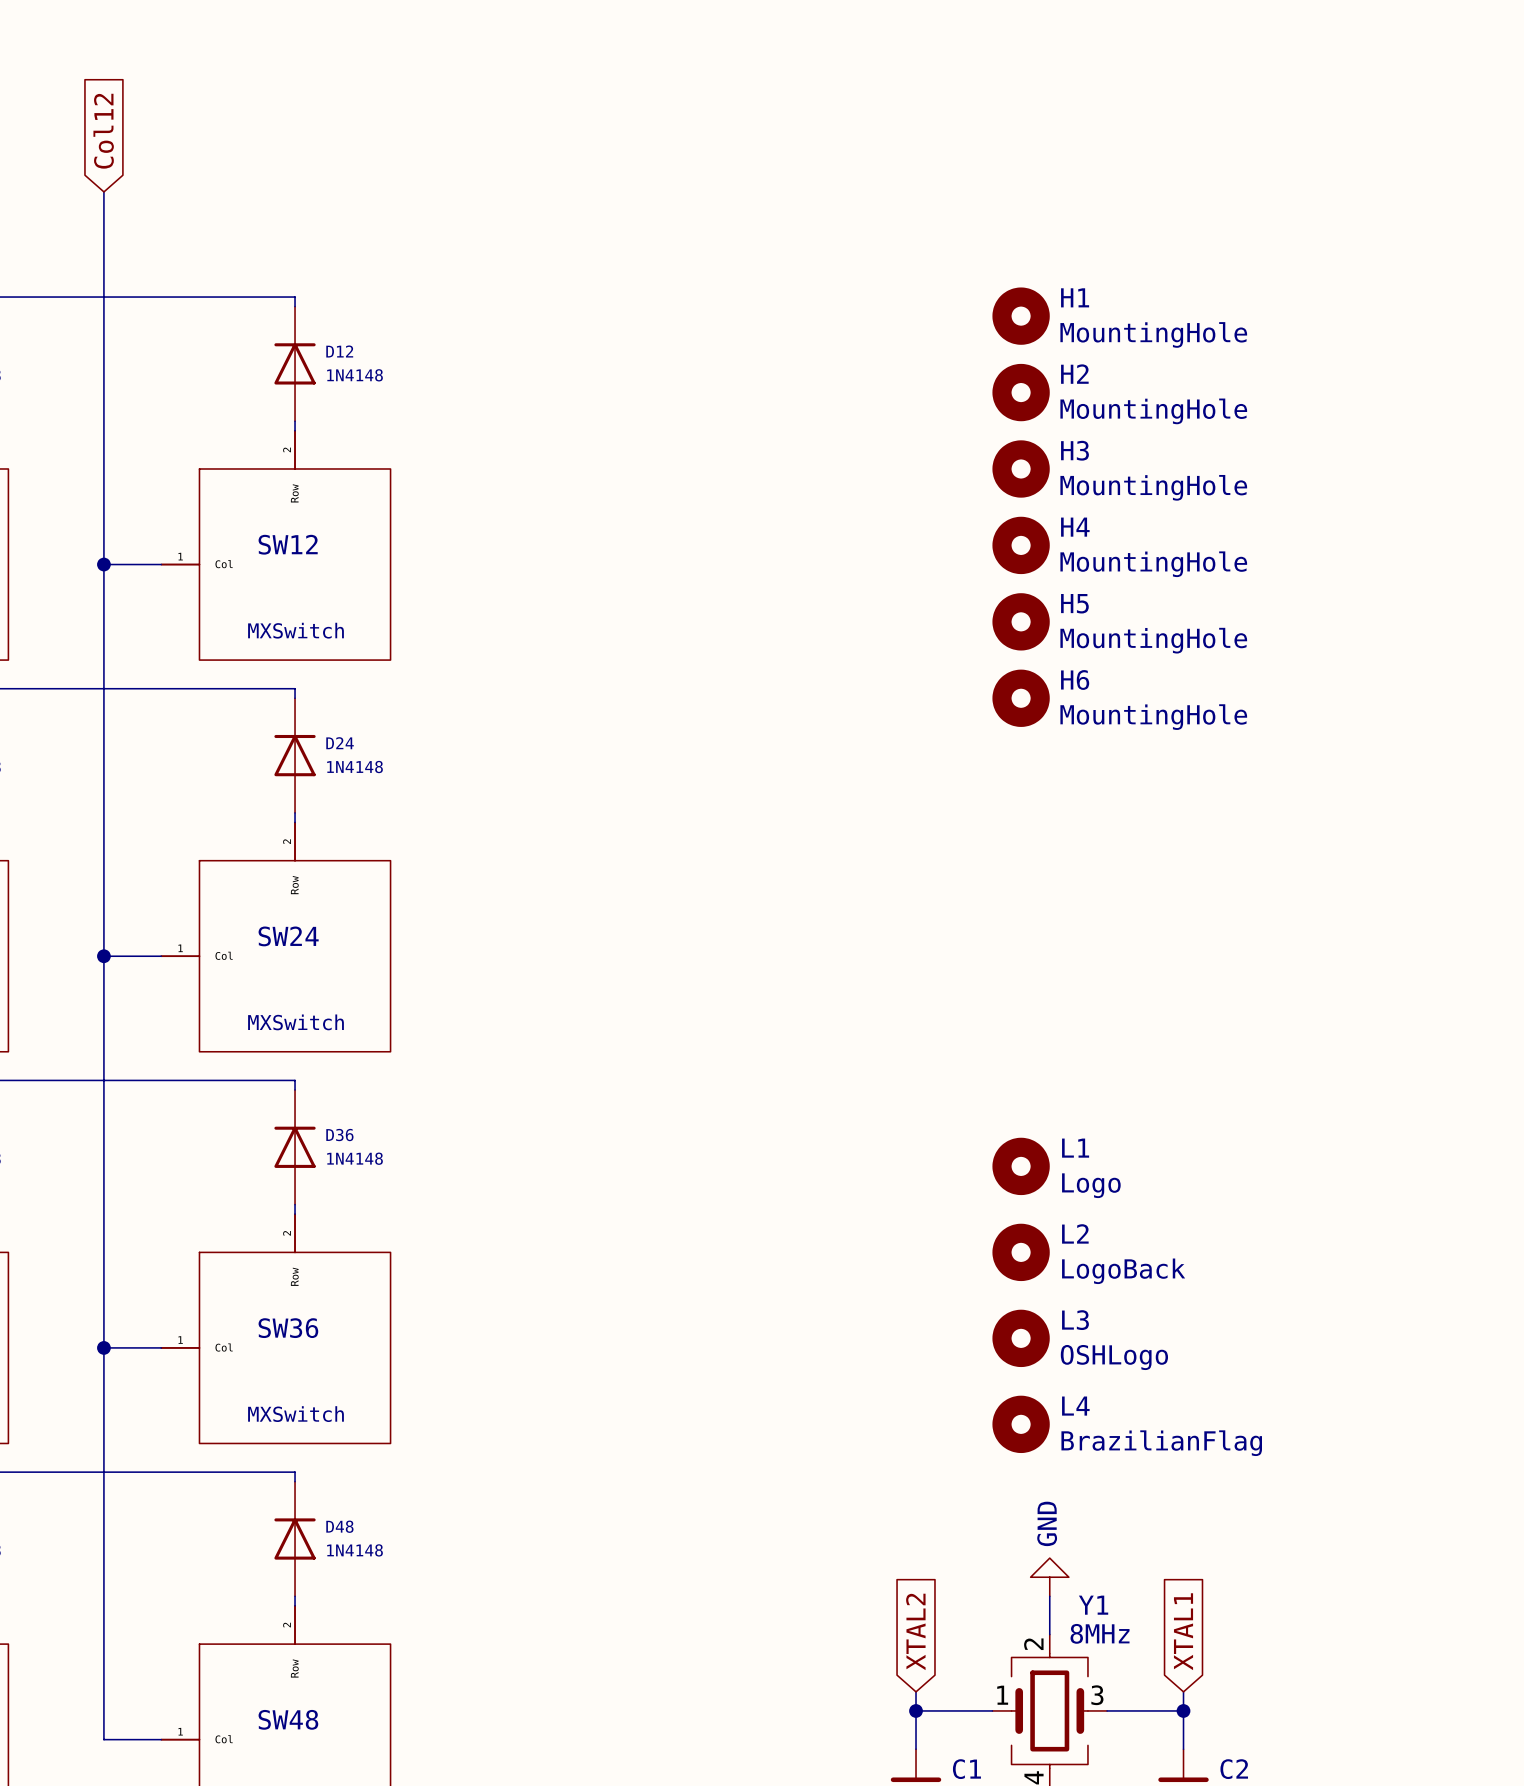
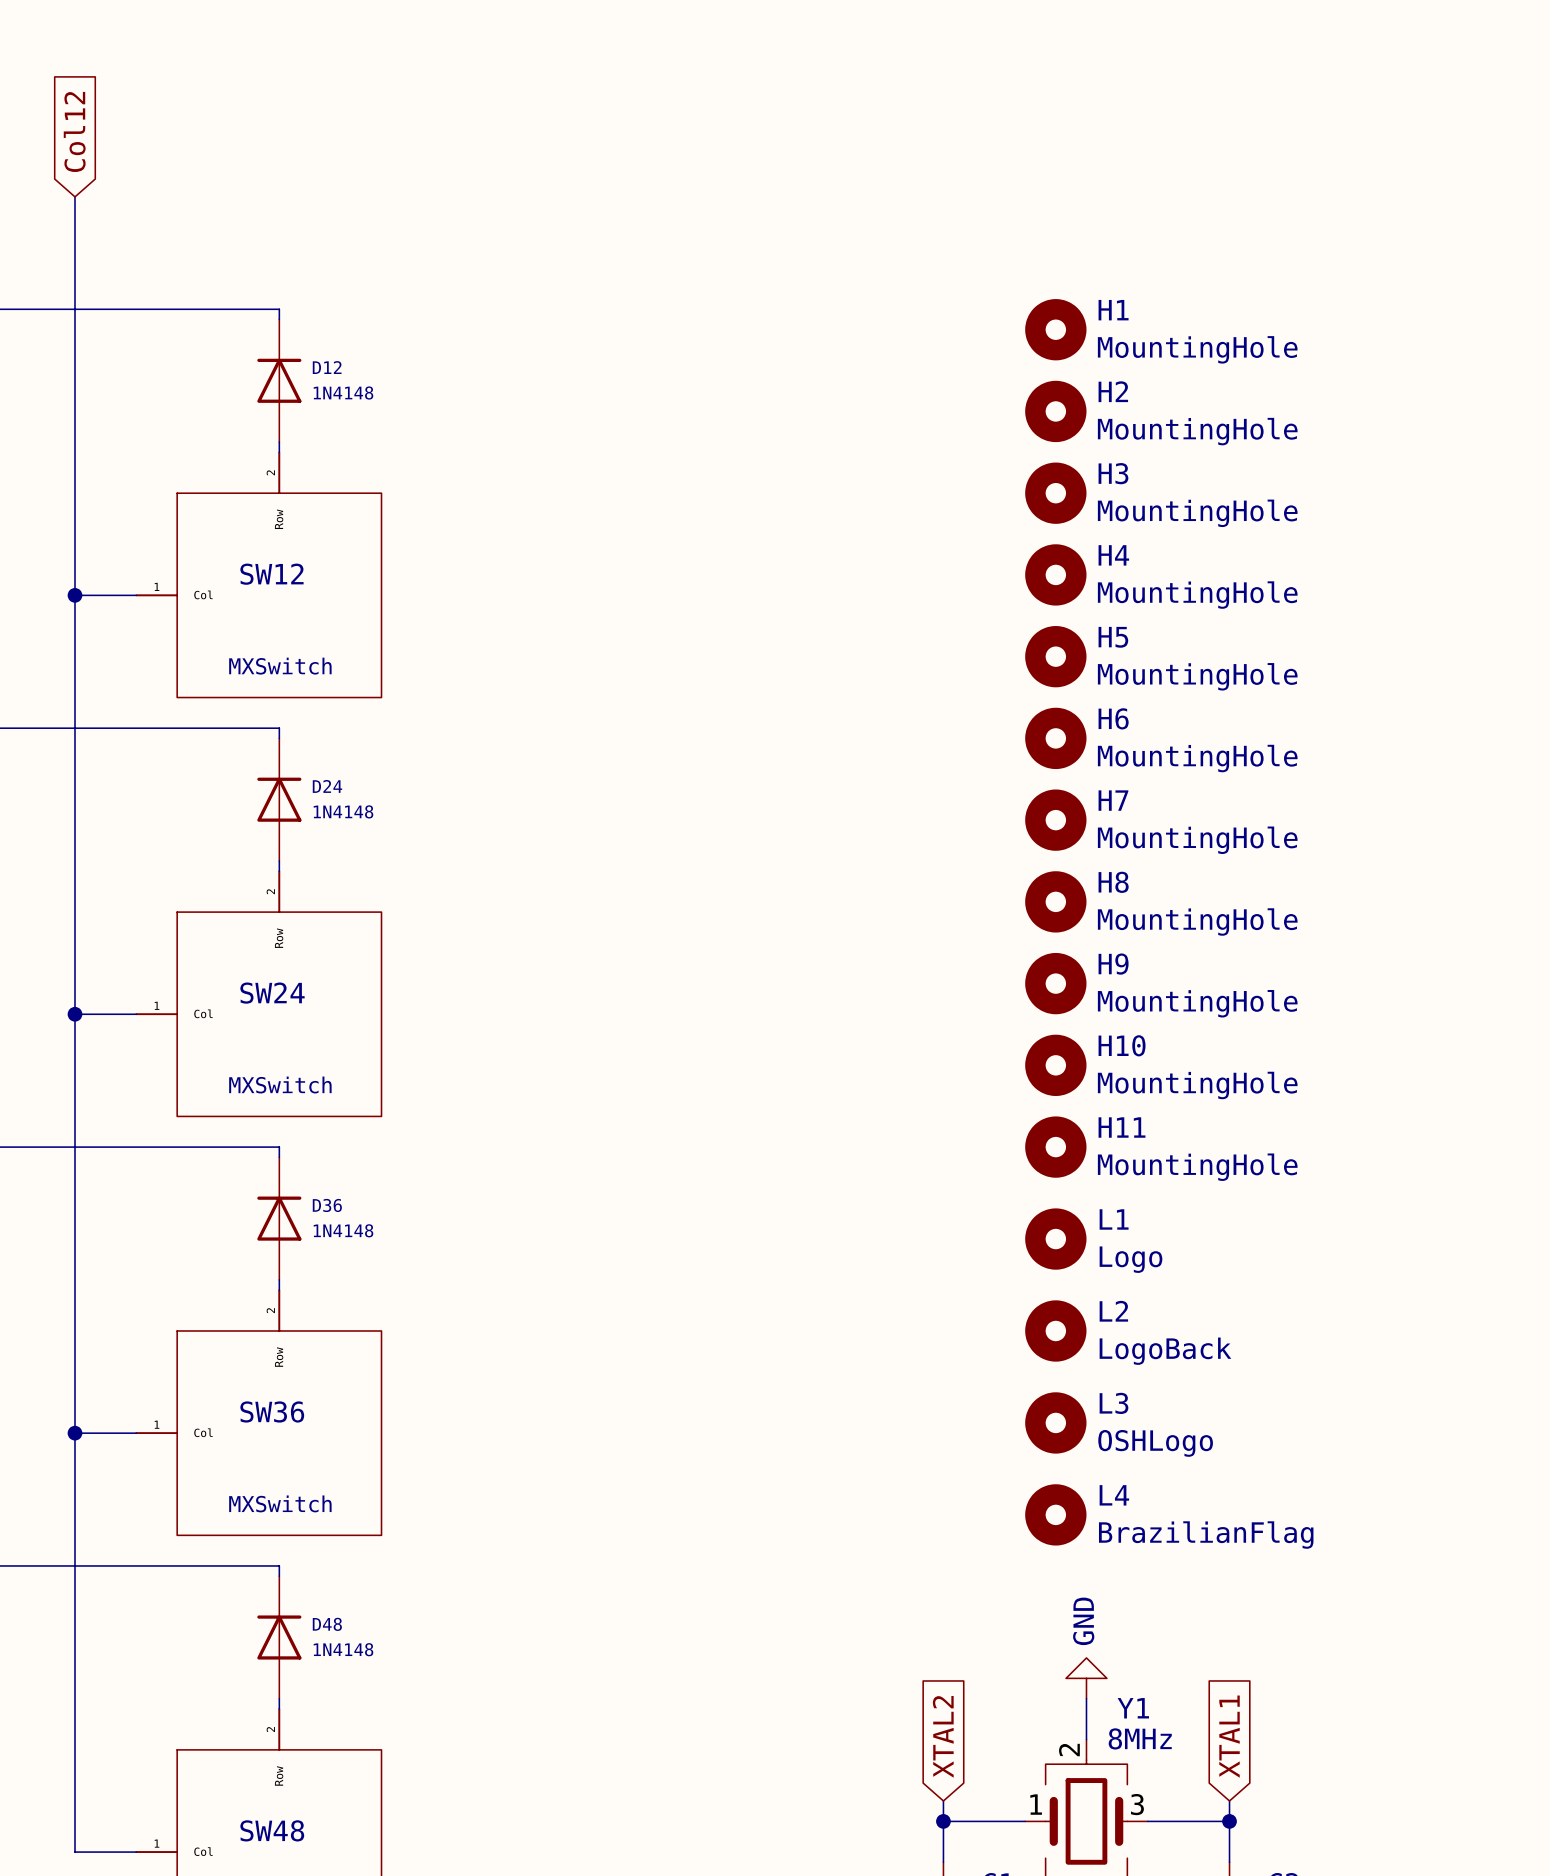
H7: none -> MountingHole (1055, 820)
H8: none -> MountingHole (1055, 901)
H9: none -> MountingHole (1055, 983)
H10: none -> MountingHole (1055, 1065)
H11: none -> MountingHole (1055, 1147)

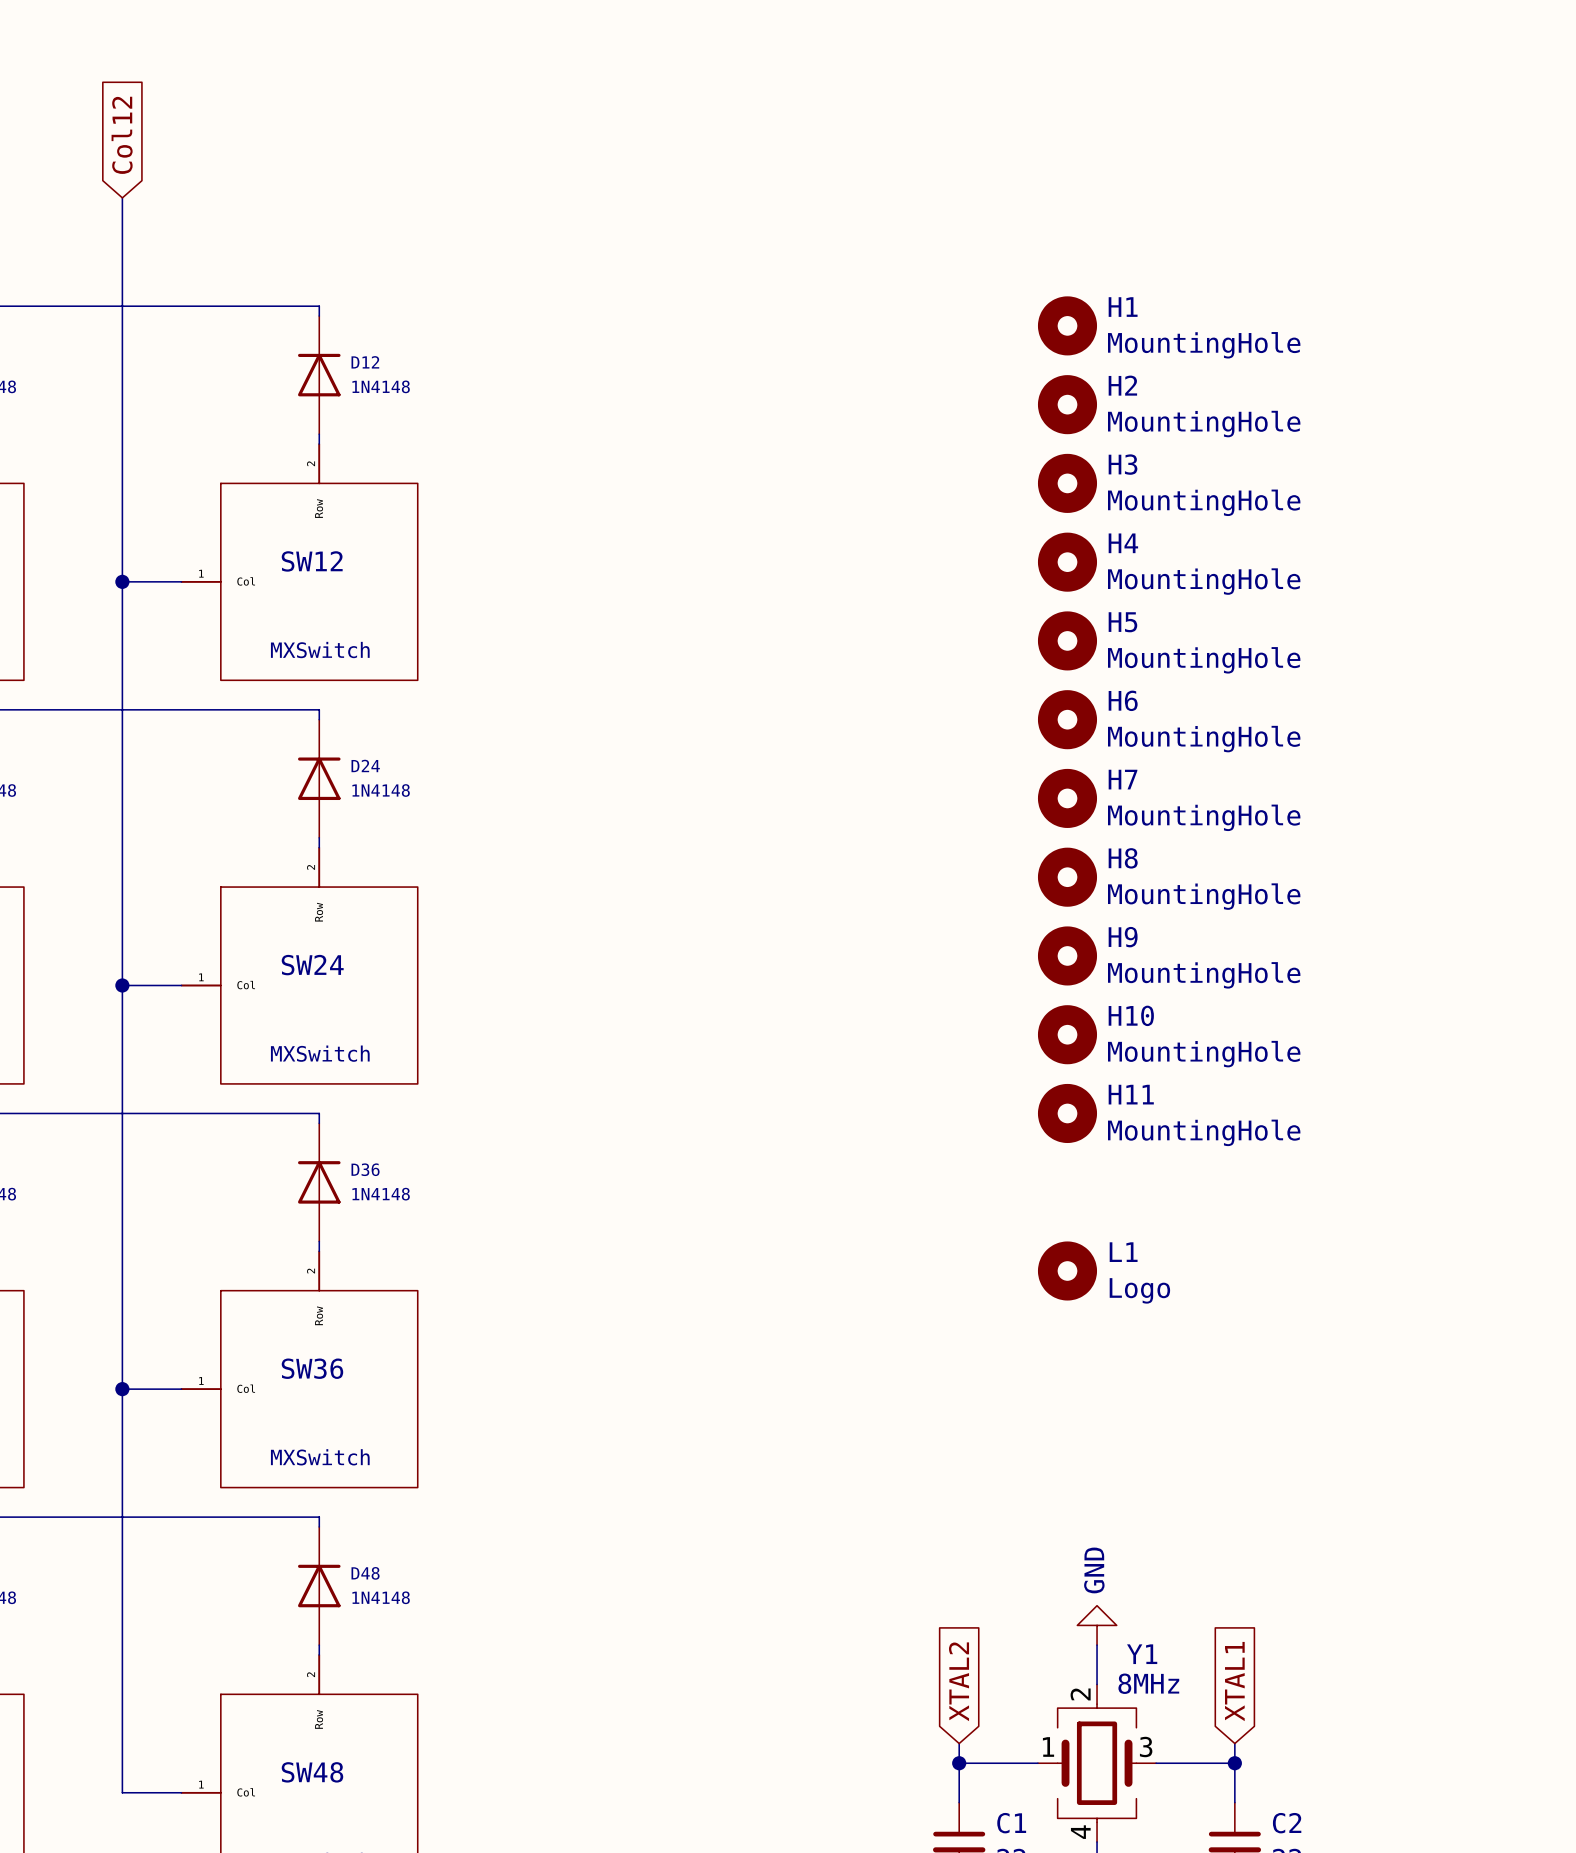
L1 position: (1055, 1239) -> (1067, 1270)
L2: LogoBack (1055, 1330) -> none
L3: OSHLogo (1055, 1422) -> none
L4: BrazilianFlag (1055, 1514) -> none

